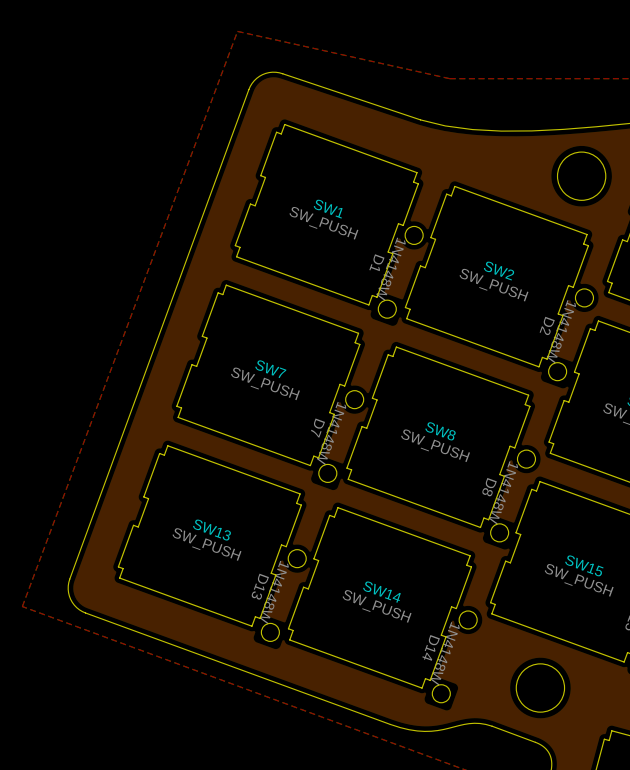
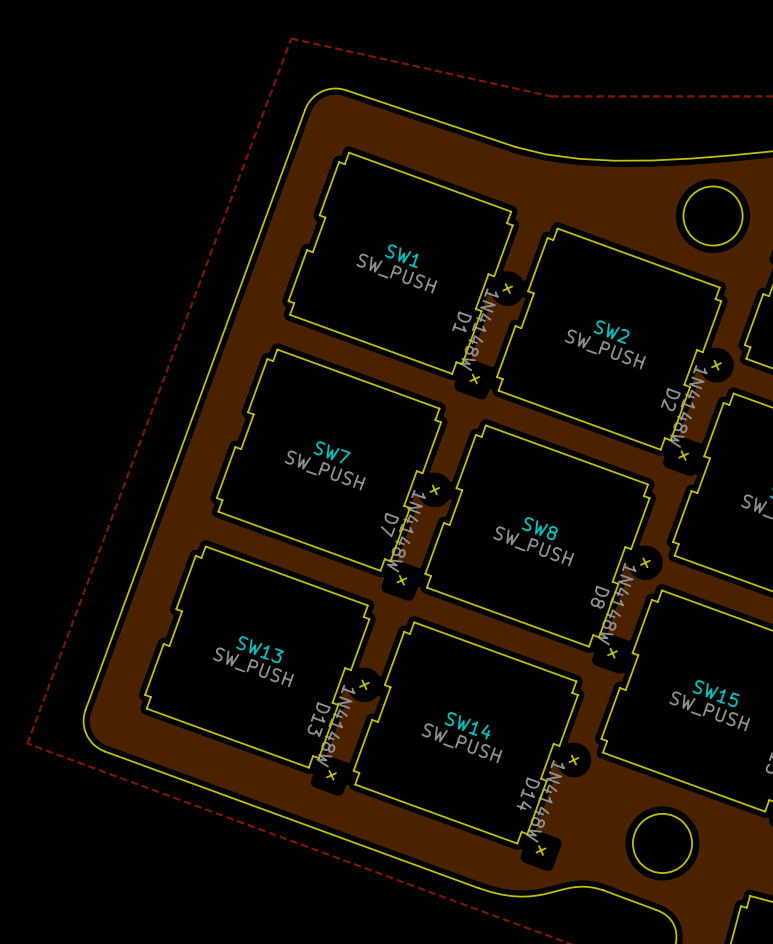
D1 footprint: [377, 225, 424, 319] -> [469, 283, 513, 385]
D2 footprint: [548, 288, 594, 382] -> [678, 360, 722, 461]
D7 footprint: [318, 390, 365, 483] -> [396, 484, 441, 586]
D8 footprint: [490, 449, 536, 543] -> [607, 557, 651, 659]
D13 footprint: [260, 549, 307, 642] -> [326, 679, 370, 781]
D14 footprint: [431, 610, 478, 704] -> [535, 754, 580, 856]

